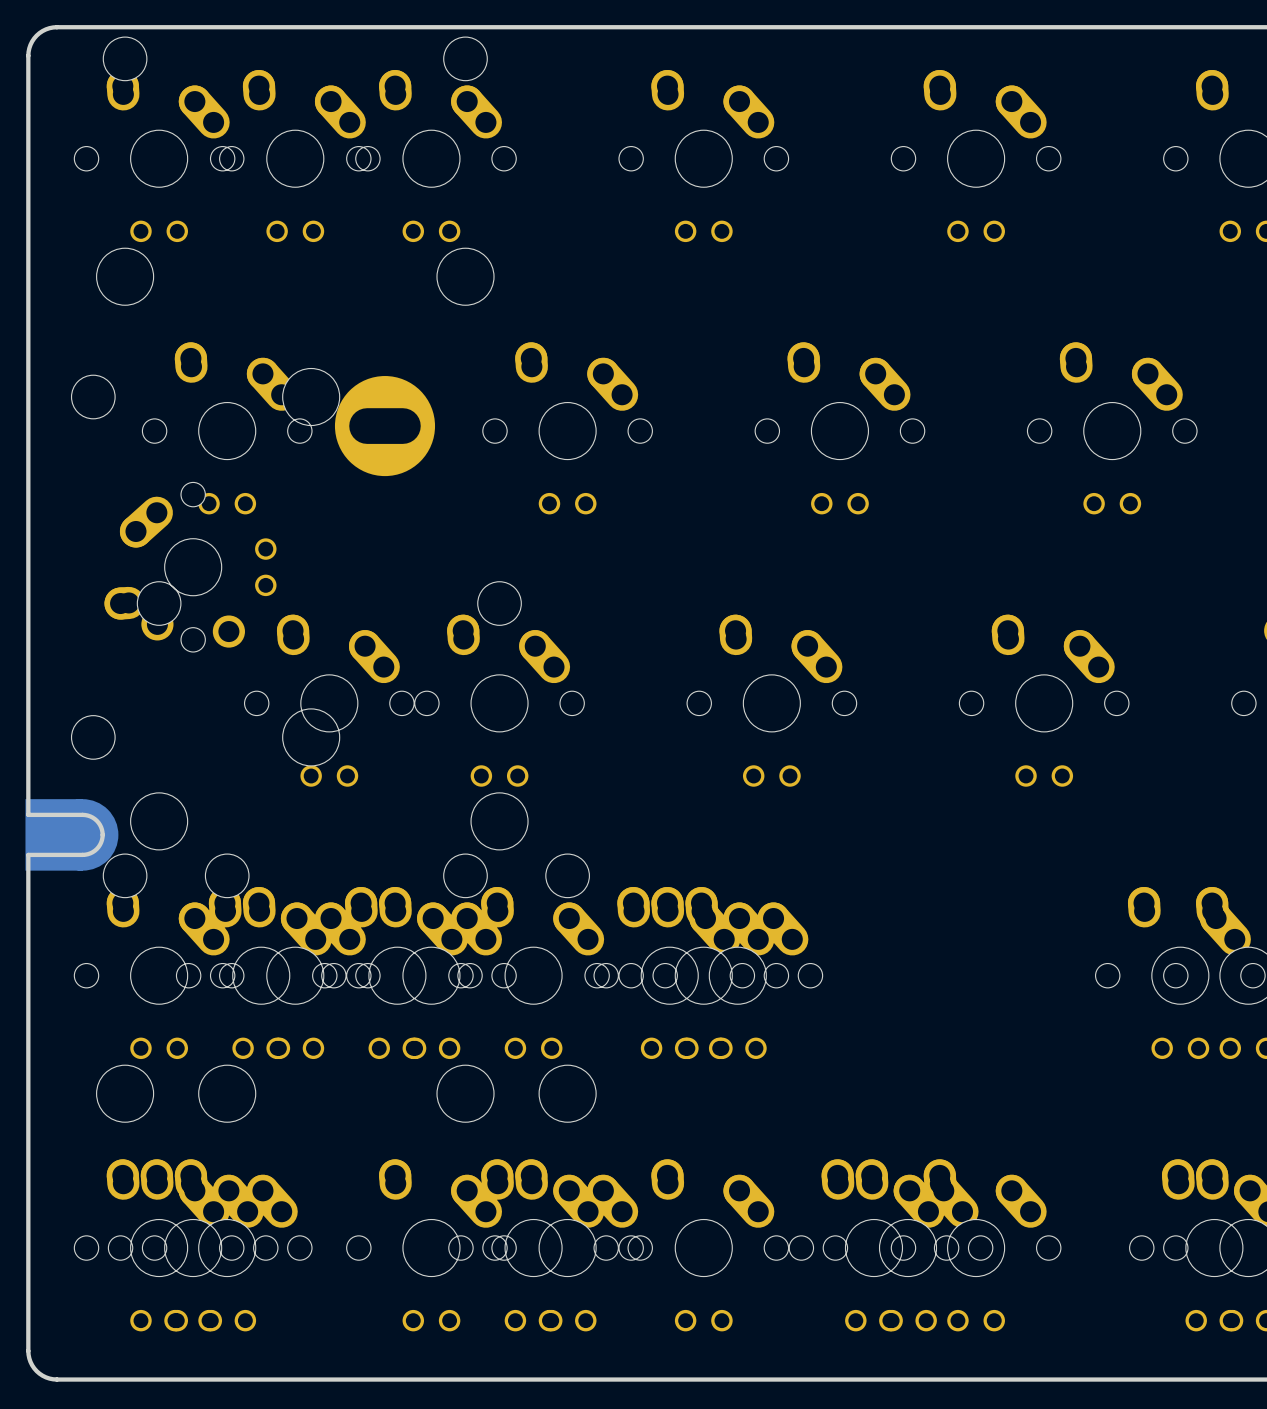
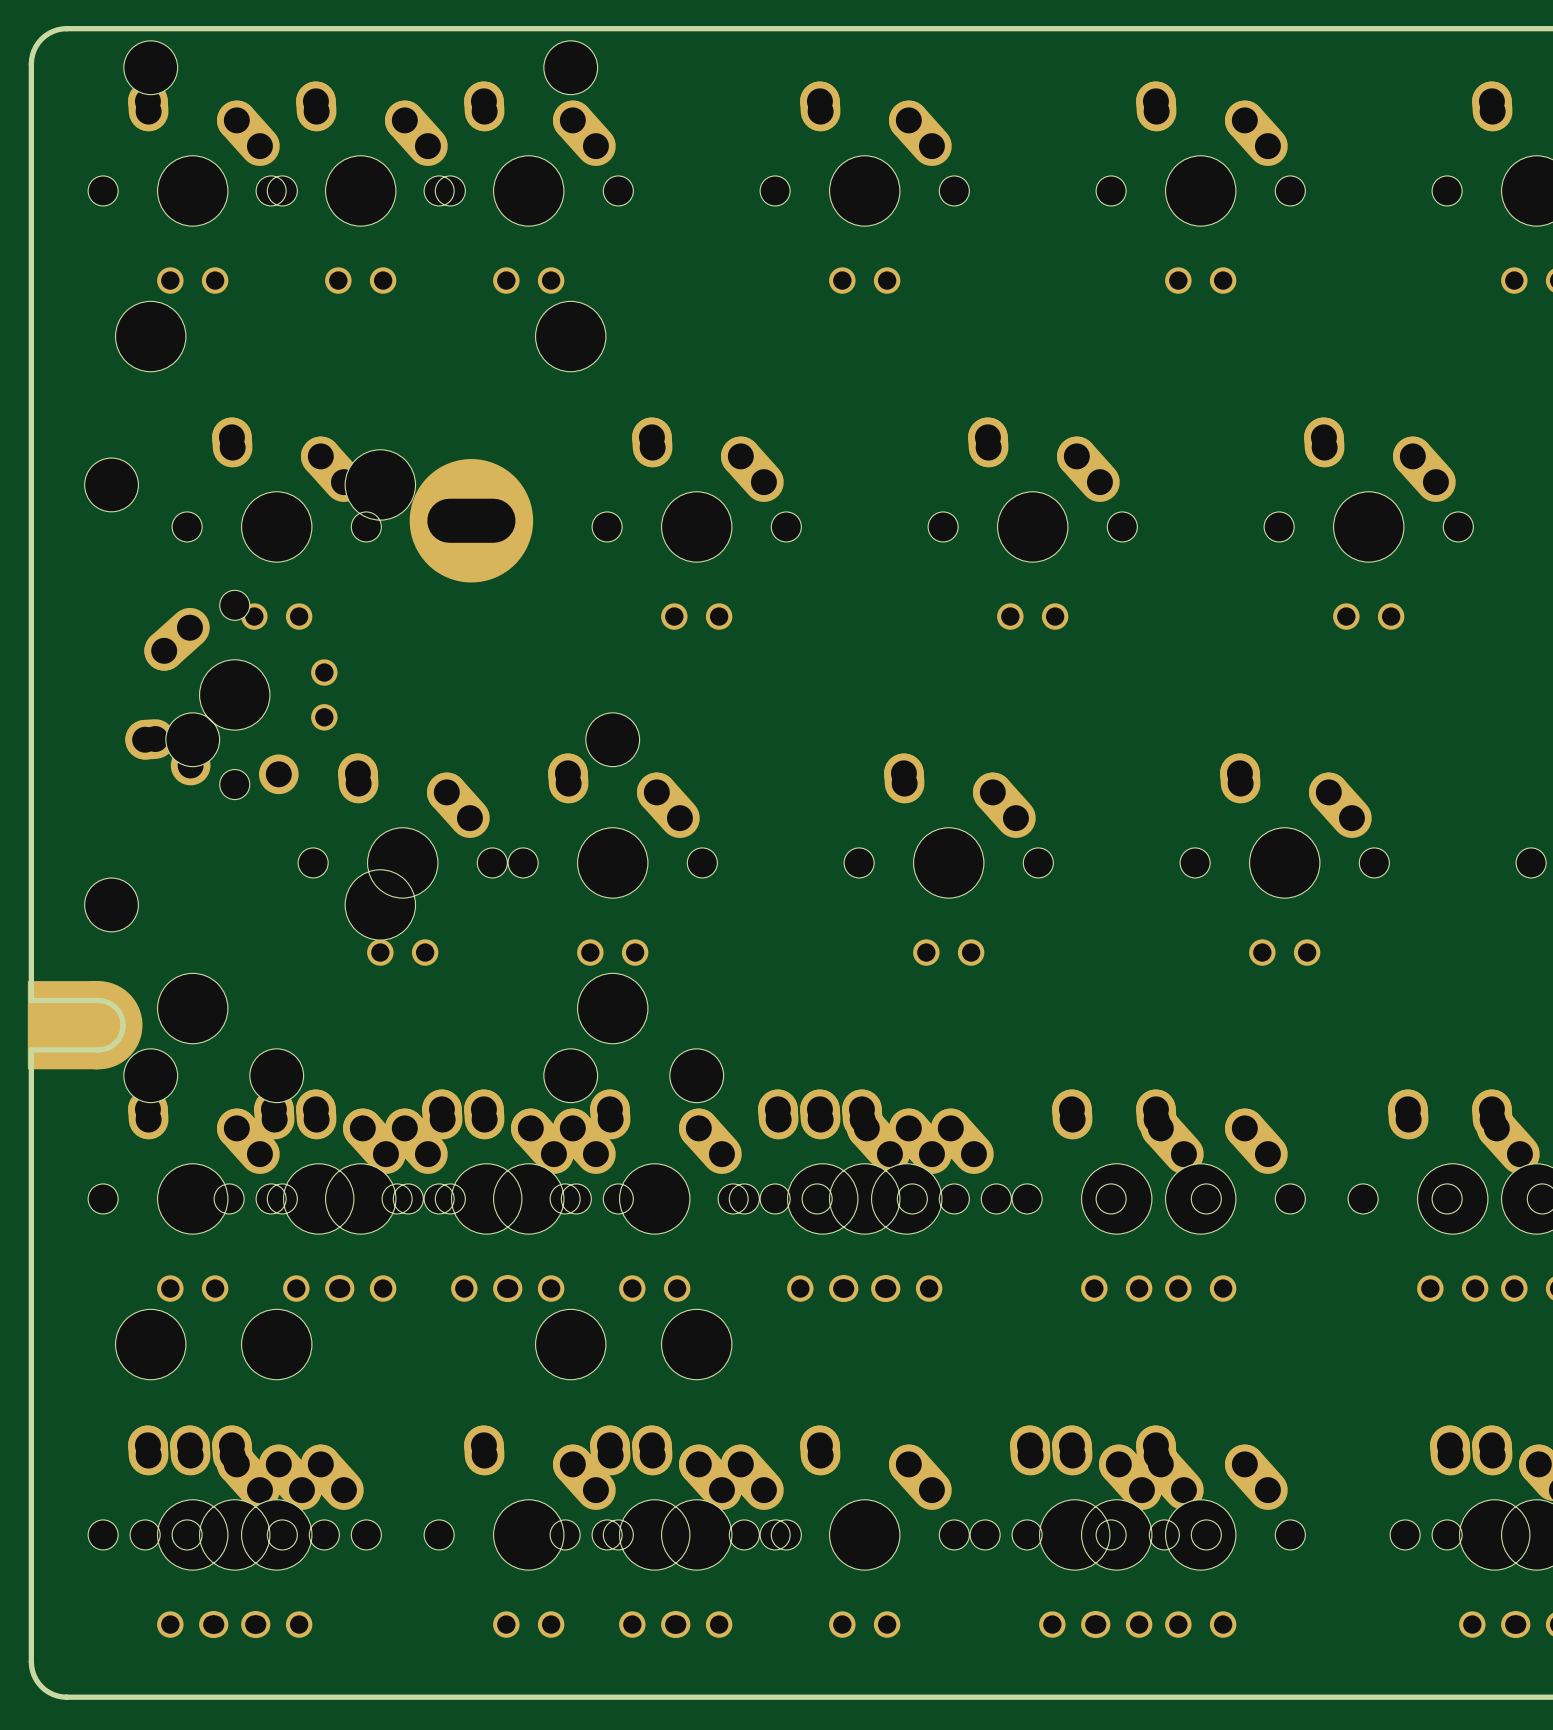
part: none -> (1116, 1195)
part: none -> (1200, 1195)

